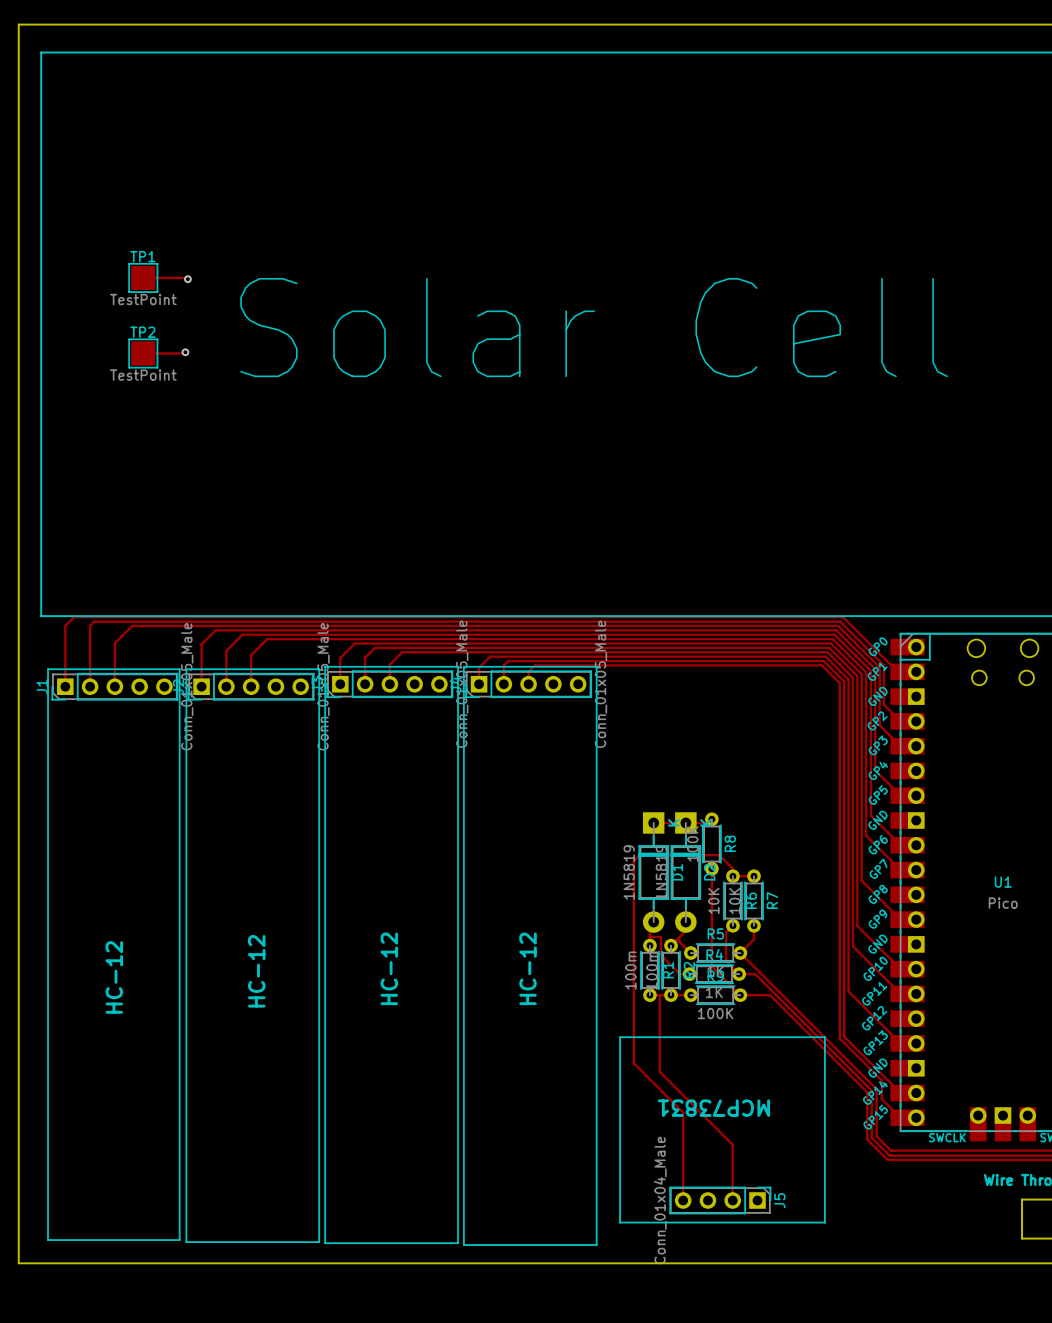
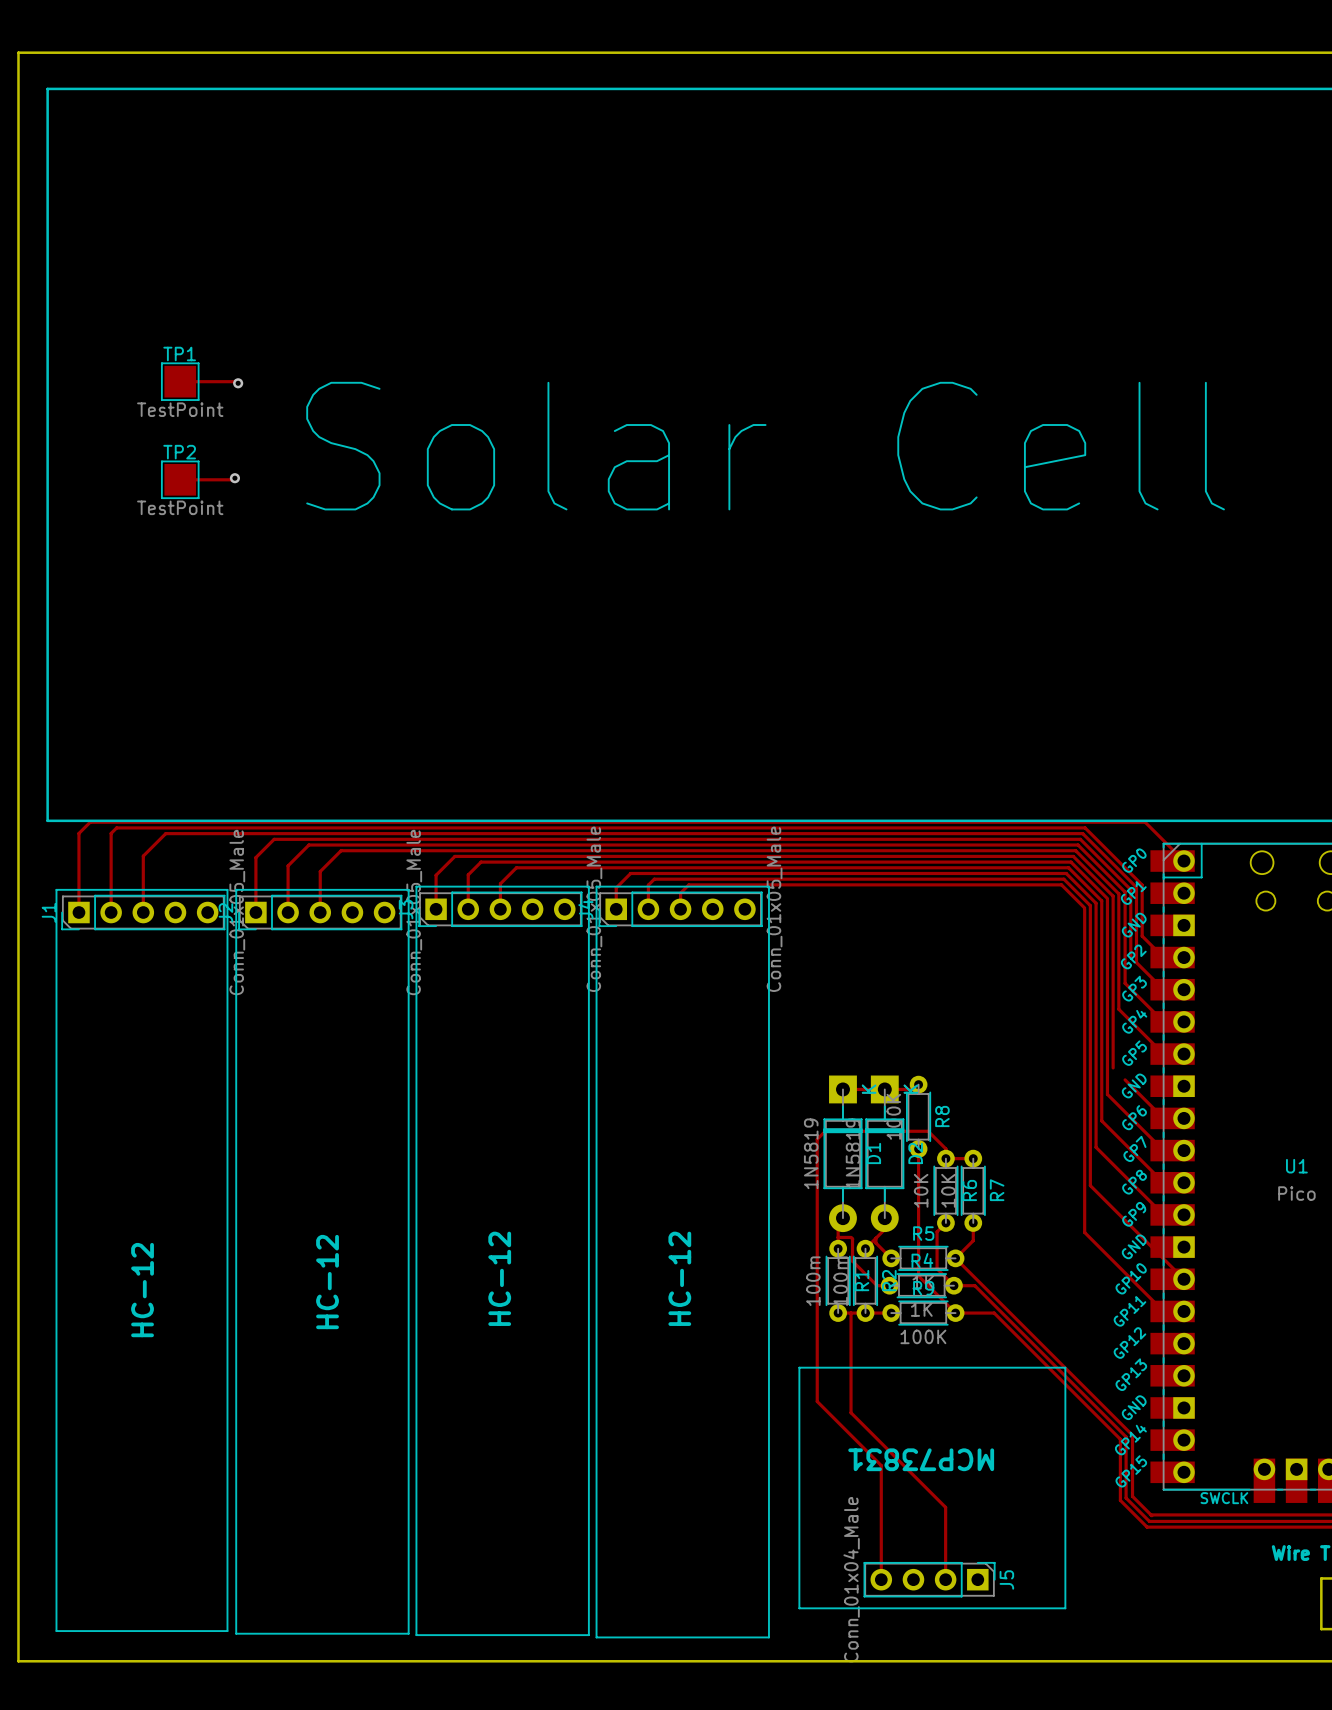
track: (843, 617) (897, 671) -> (1088, 822) (1145, 822) (1184, 861)
track: (875, 720) (875, 770) -> (1118, 1009) (1130, 1021)
track: (870, 741) (870, 815) -> (1125, 983) (1163, 1021)
track: (866, 761) (866, 835) -> (1107, 1094) (1118, 1105)
track: (861, 806) (861, 880) -> (1096, 1147) (1113, 1164)
track: (857, 826) (857, 925) (900, 969) (916, 969) -> (1090, 1185) (1184, 1279)
track: (852, 847) (852, 946) -> (1101, 1120) (1163, 1182)
track: (848, 867) (848, 991) (900, 1043) (916, 1043) -> none
track: (844, 897) (844, 1036) (900, 1093) (916, 1093) -> none
track: (839, 933) (839, 1038) (881, 1080) (881, 1099) (900, 1117) (916, 1117) -> (1084, 1232) (1101, 1249)

